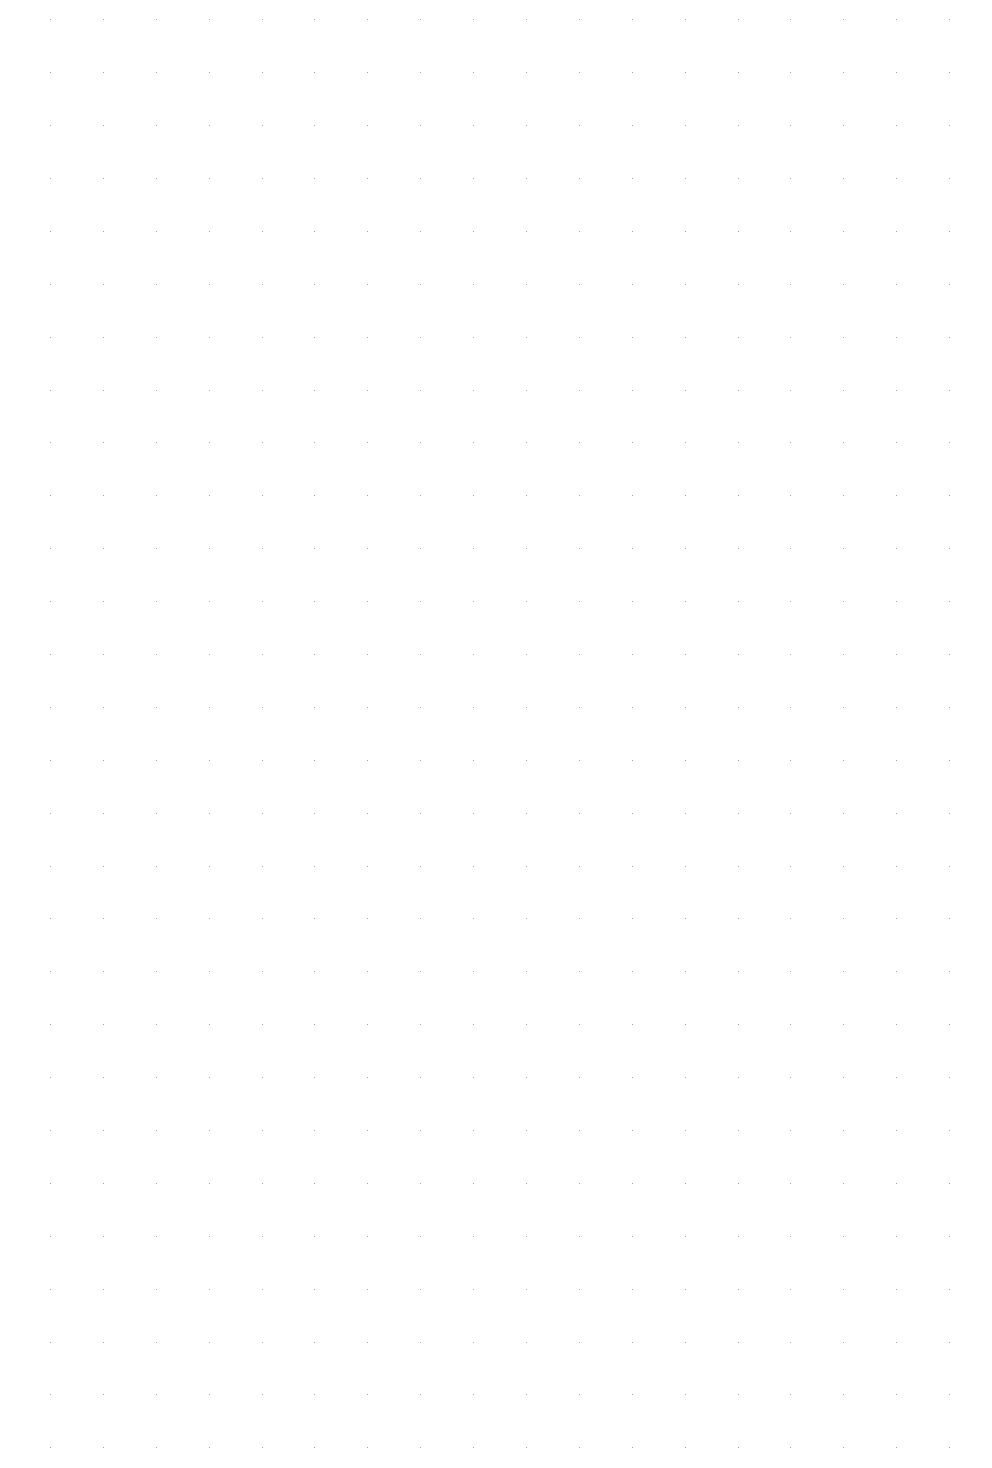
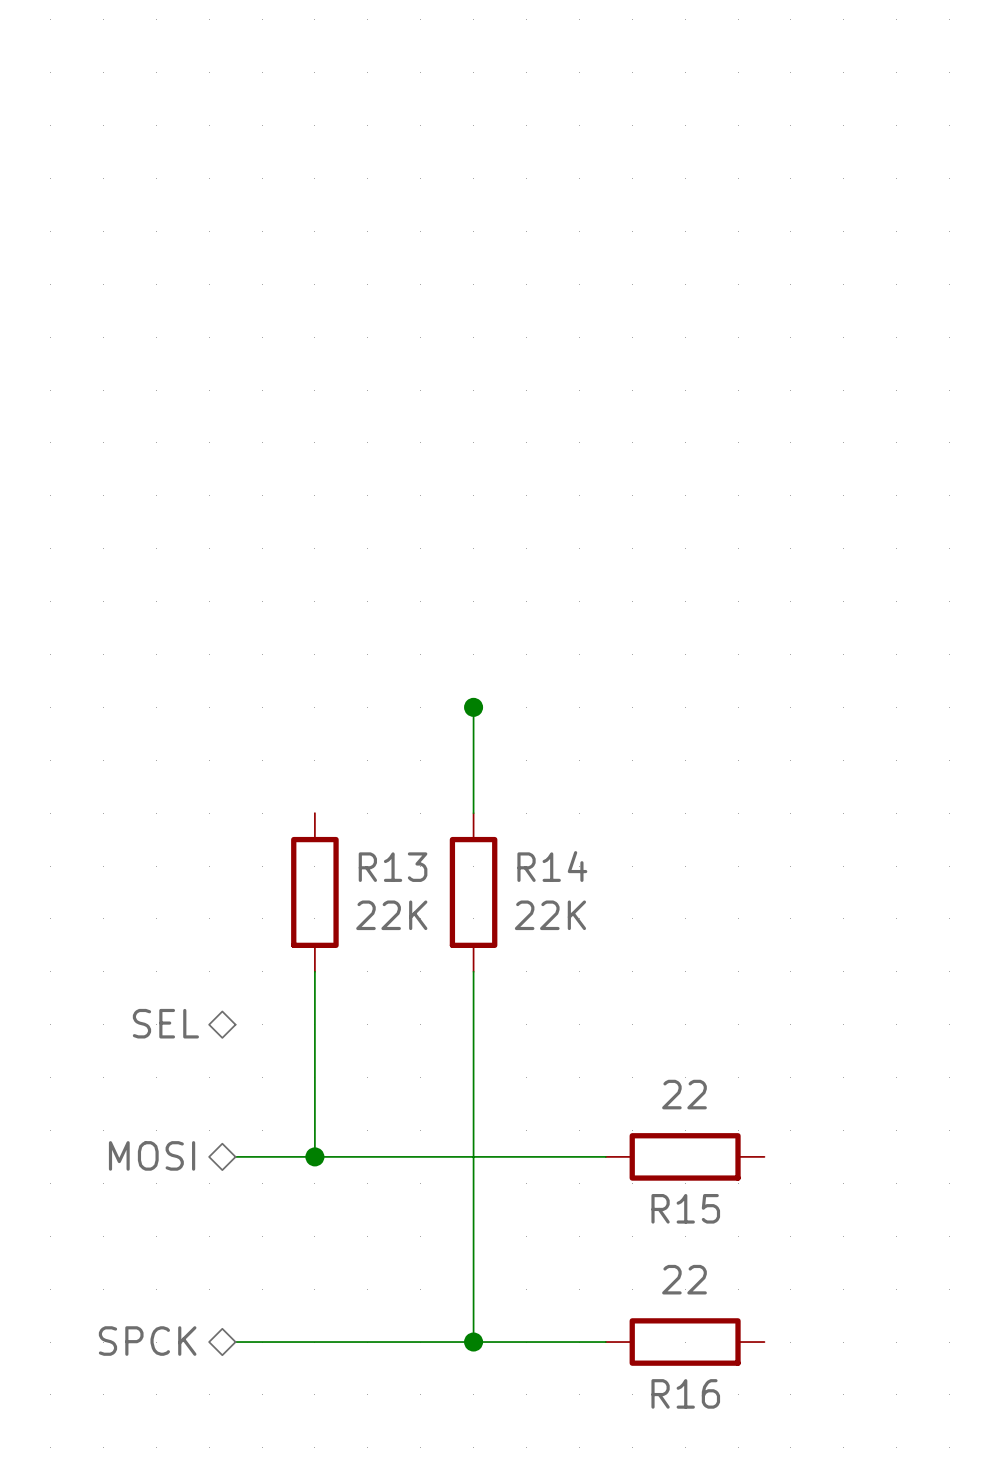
wire: none -> (473, 707) (473, 813)
junction: none -> (473, 707)
R13: none -> 22K (314, 892)
R14: none -> 22K (473, 892)
wire: none -> (314, 971) (314, 1156)
wire: none -> (473, 971) (473, 1342)
hierarchical label: none -> SEL (165, 1023)
hierarchical label: none -> MOSI (152, 1155)
wire: none -> (235, 1156) (605, 1156)
junction: none -> (314, 1156)
R15: none -> 22 (685, 1156)
hierarchical label: none -> SPCK (147, 1341)
wire: none -> (235, 1342) (605, 1342)
junction: none -> (473, 1342)
R16: none -> 22 (685, 1342)

